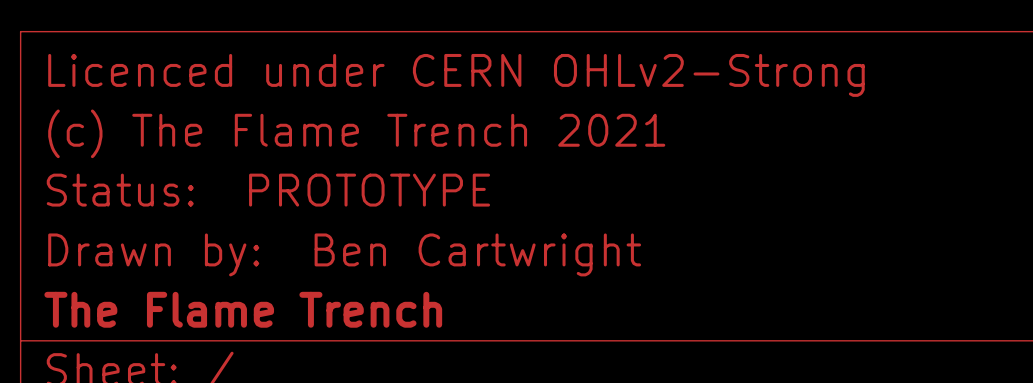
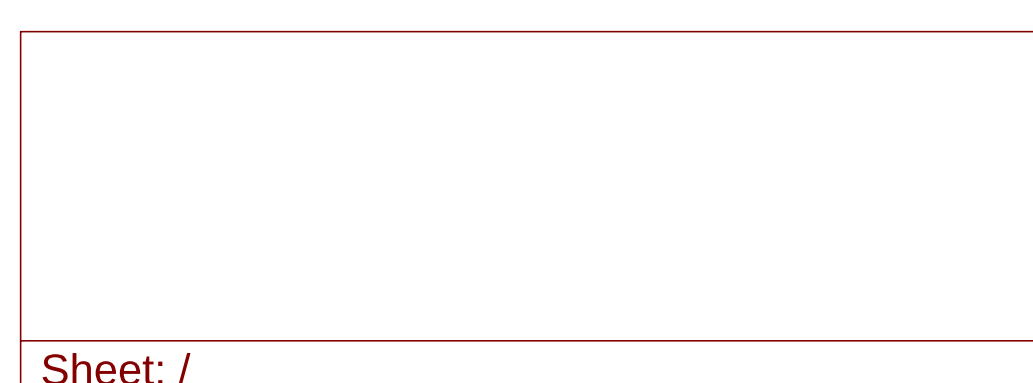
title block: Licenced under CERN OHLv2-Strong (456, 75) -> none
title block: (c) The Flame Trench 2021 (356, 133) -> none
title block: Status: PROTOTYPE (268, 190) -> none
title block: Drawn by: Ben Cartwright (344, 254) -> none
title block: The Flame Trench (243, 309) -> none

